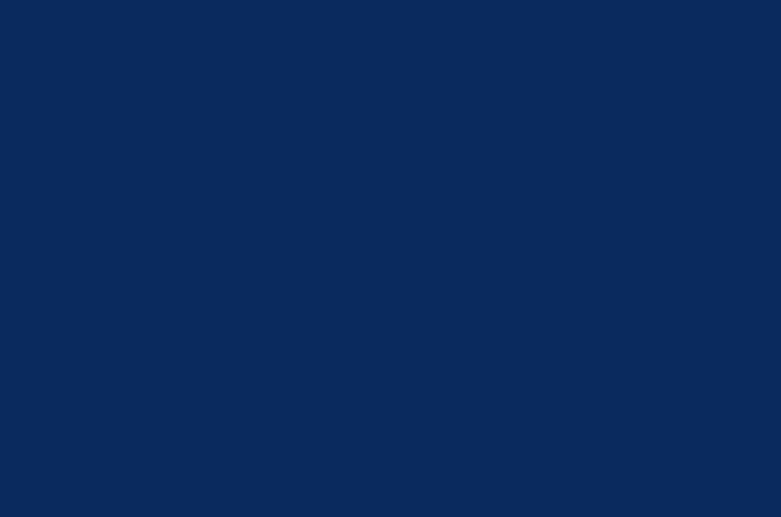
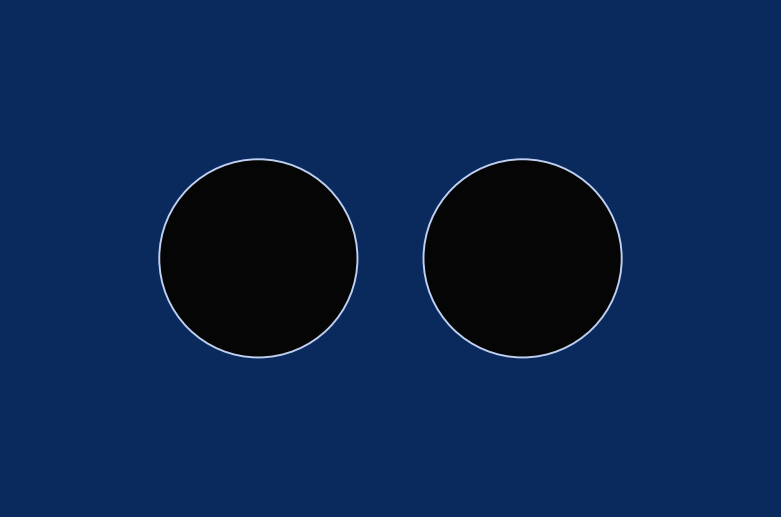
part: none -> (258, 258)
part: none -> (522, 258)

